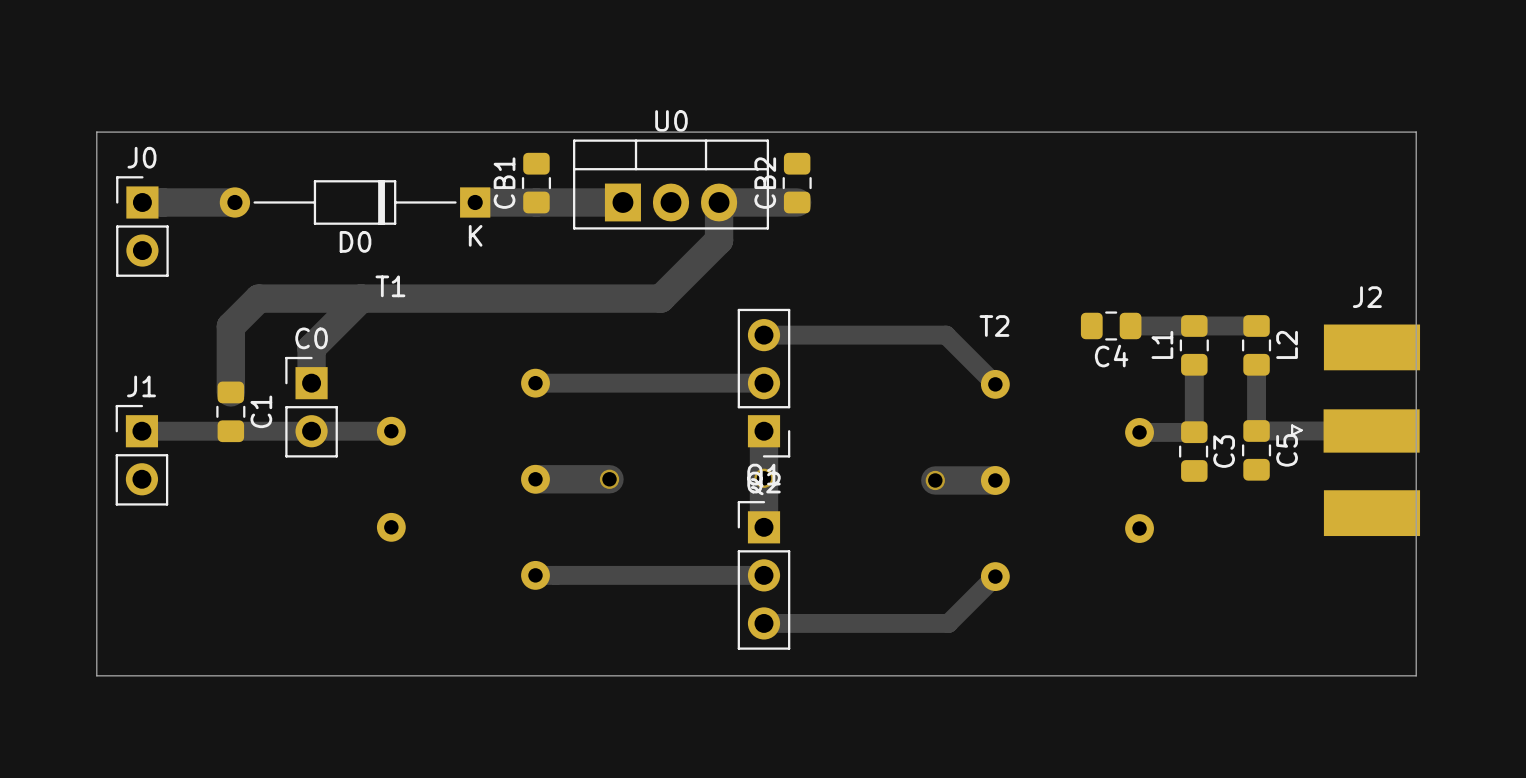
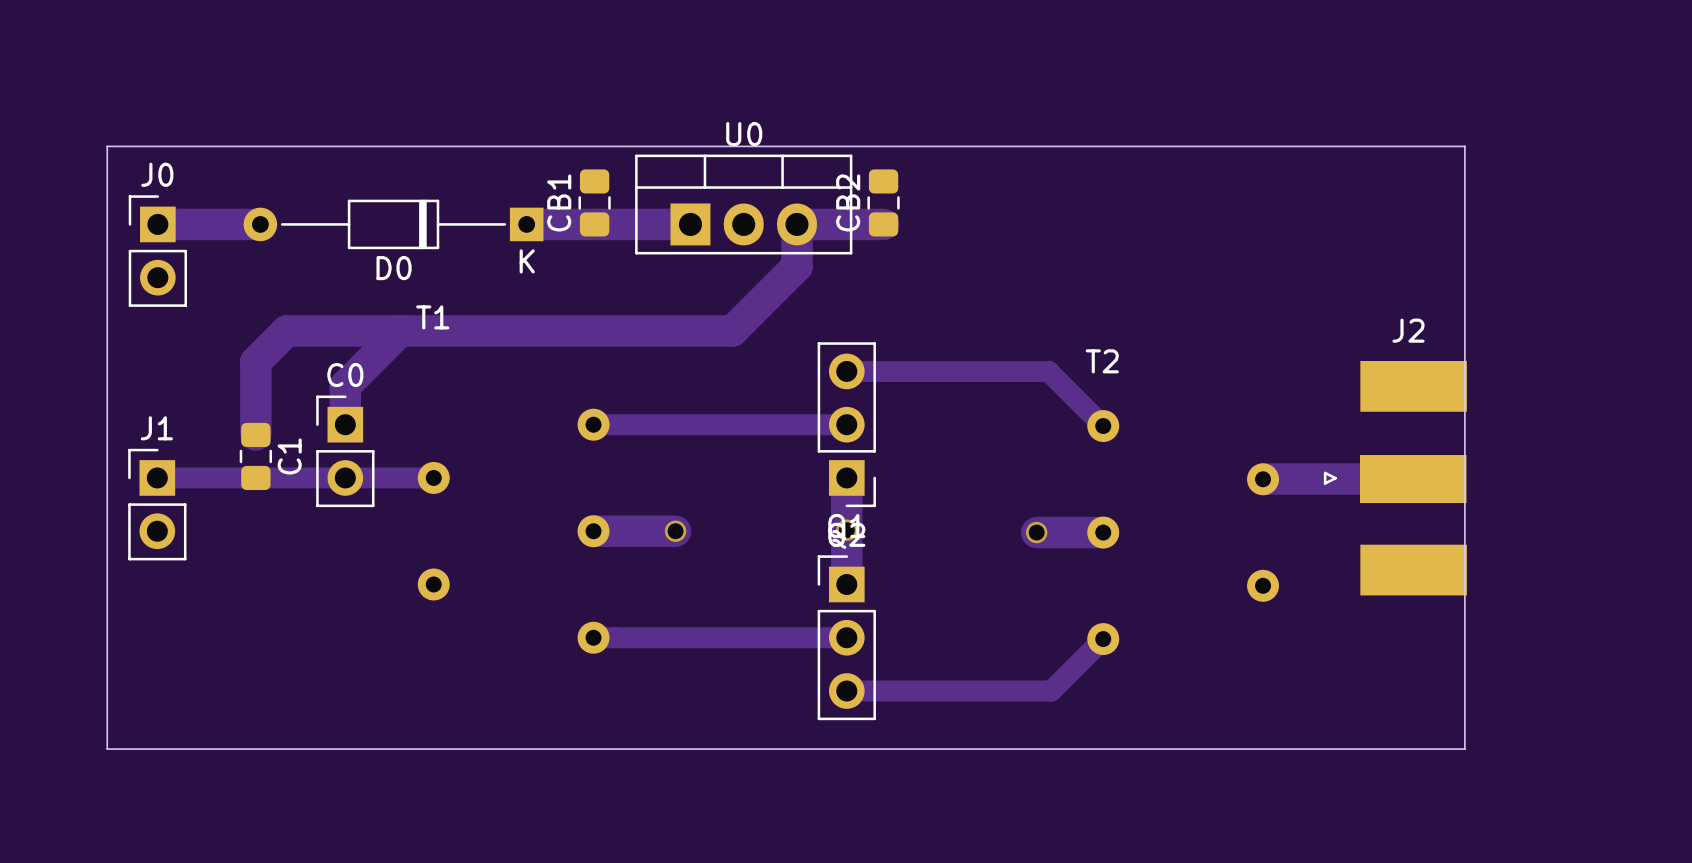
board edge: (1321, 132) (1416, 132) (1416, 675) (1321, 675) -> (1464, 146) (1464, 749)
C4: (1111, 325) -> none
track: (1130, 325) (1256, 325) -> none
L1: (1194, 345) -> none
L2: (1256, 345) -> none
track: (1194, 364) (1194, 432) -> none
track: (1256, 364) (1256, 430) (1371, 430) -> none
J2 position: (1355, 430) -> (1395, 478)
track: (1139, 432) (1194, 432) -> (1263, 479) (1413, 479)
C5: (1256, 450) -> none
C3: (1193, 451) -> none

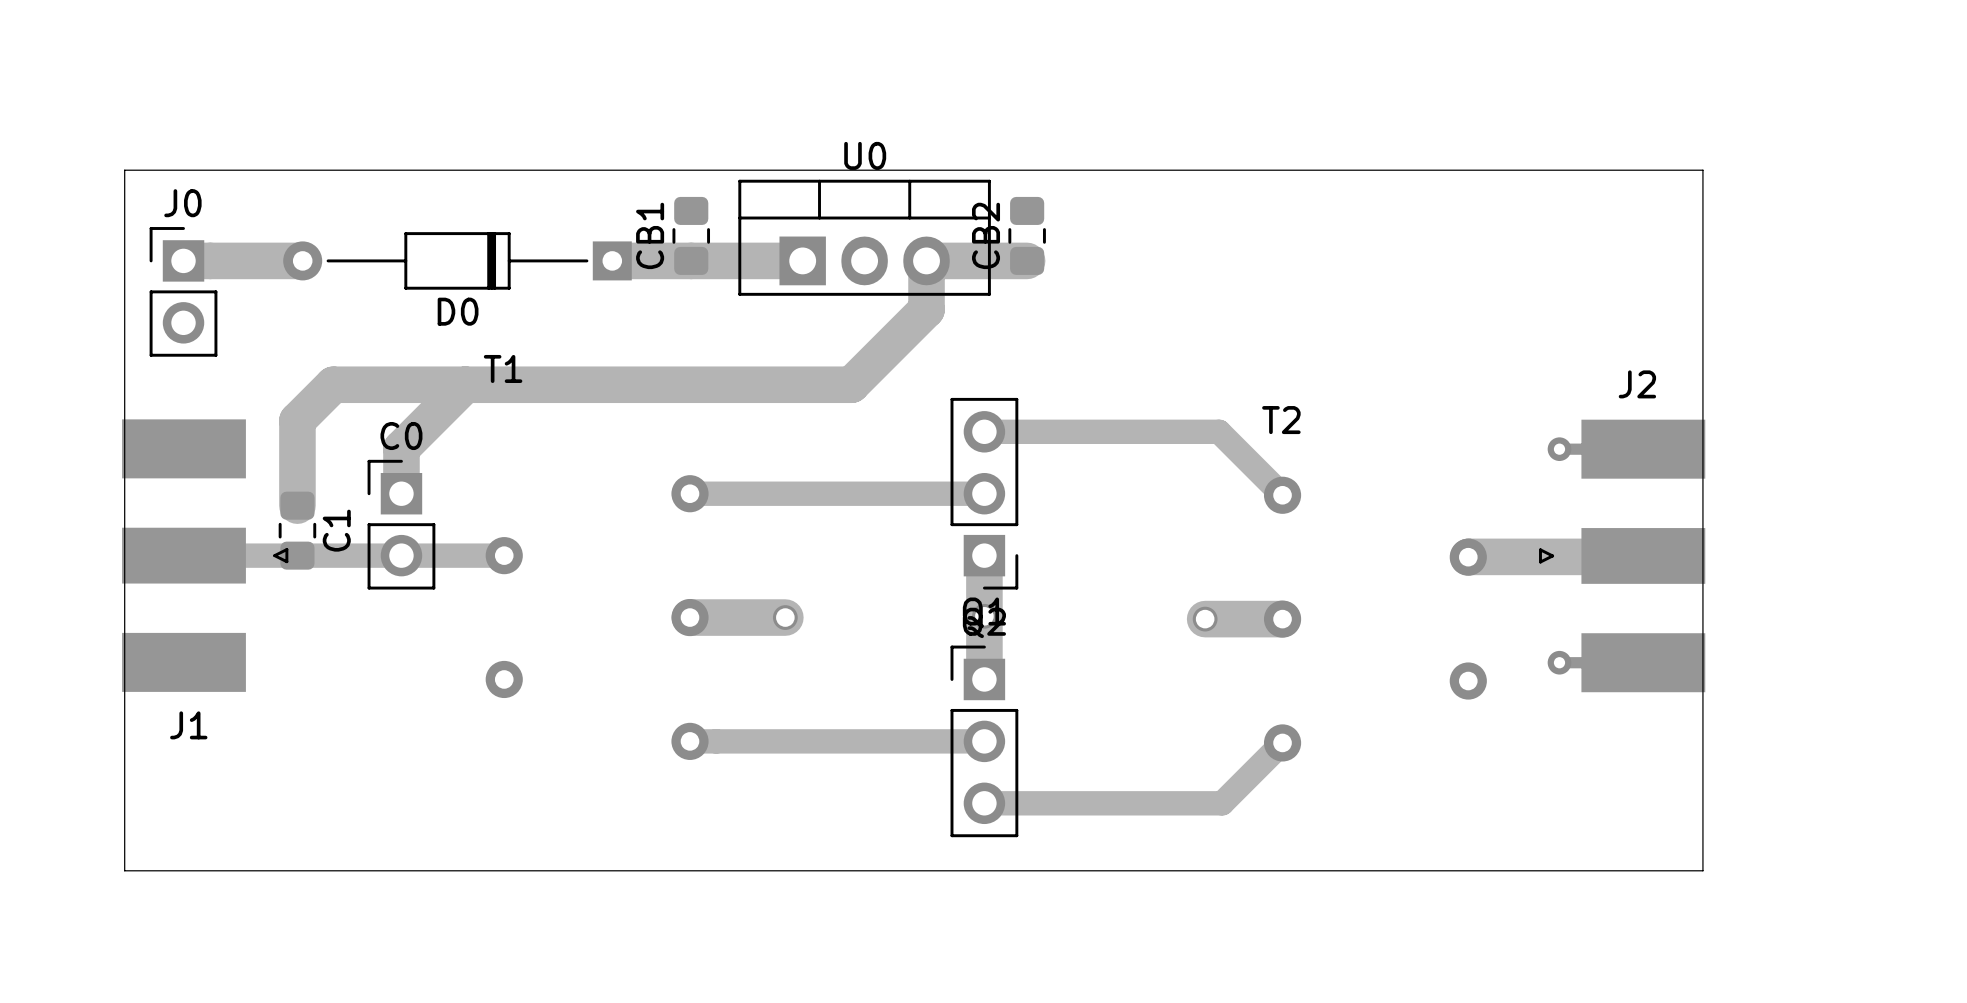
D0 text: K (527, 261) -> none
J2 footprint: [1323, 361, 1467, 596] -> [1539, 419, 1706, 693]
J1 name position: J1 (156, 428) -> J1 (188, 725)
J1 footprint: [128, 448, 187, 561] -> [122, 419, 289, 692]

